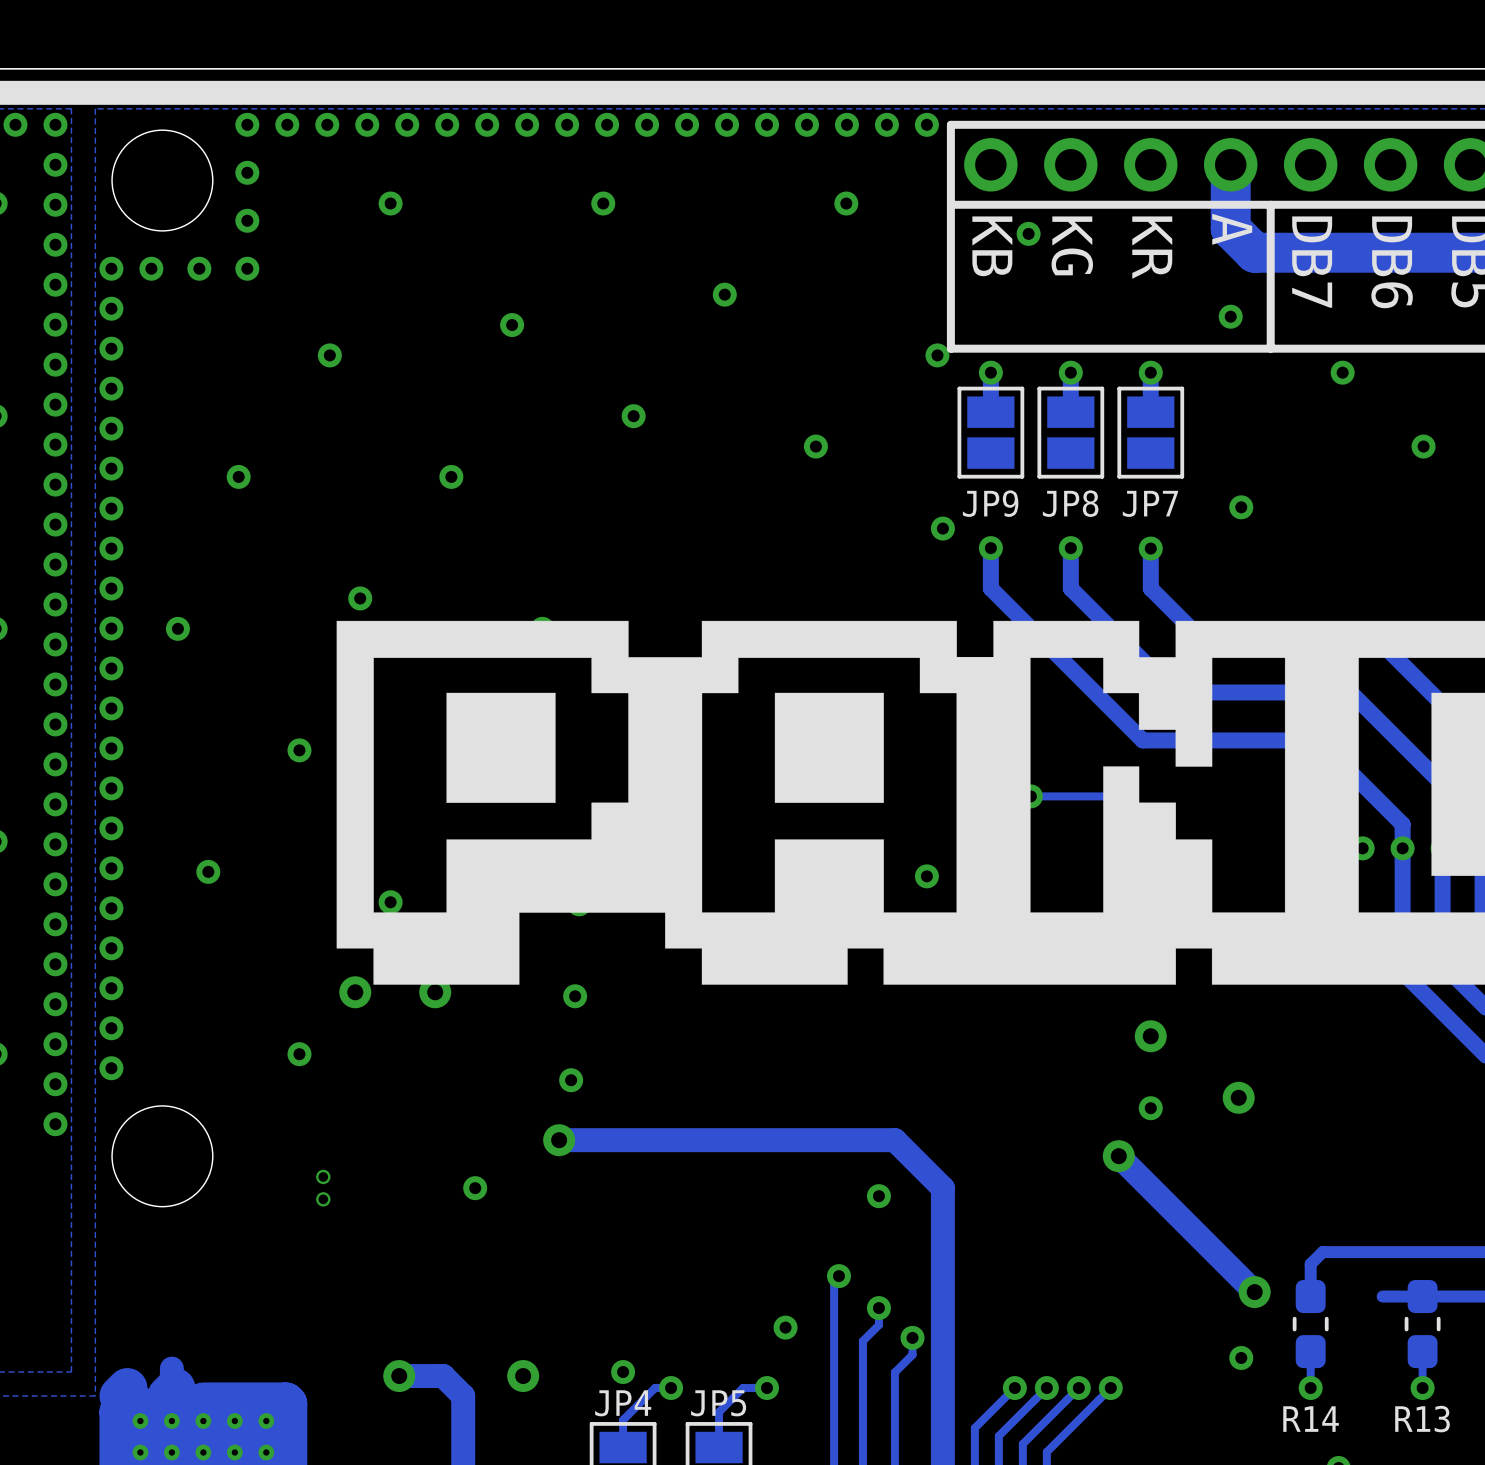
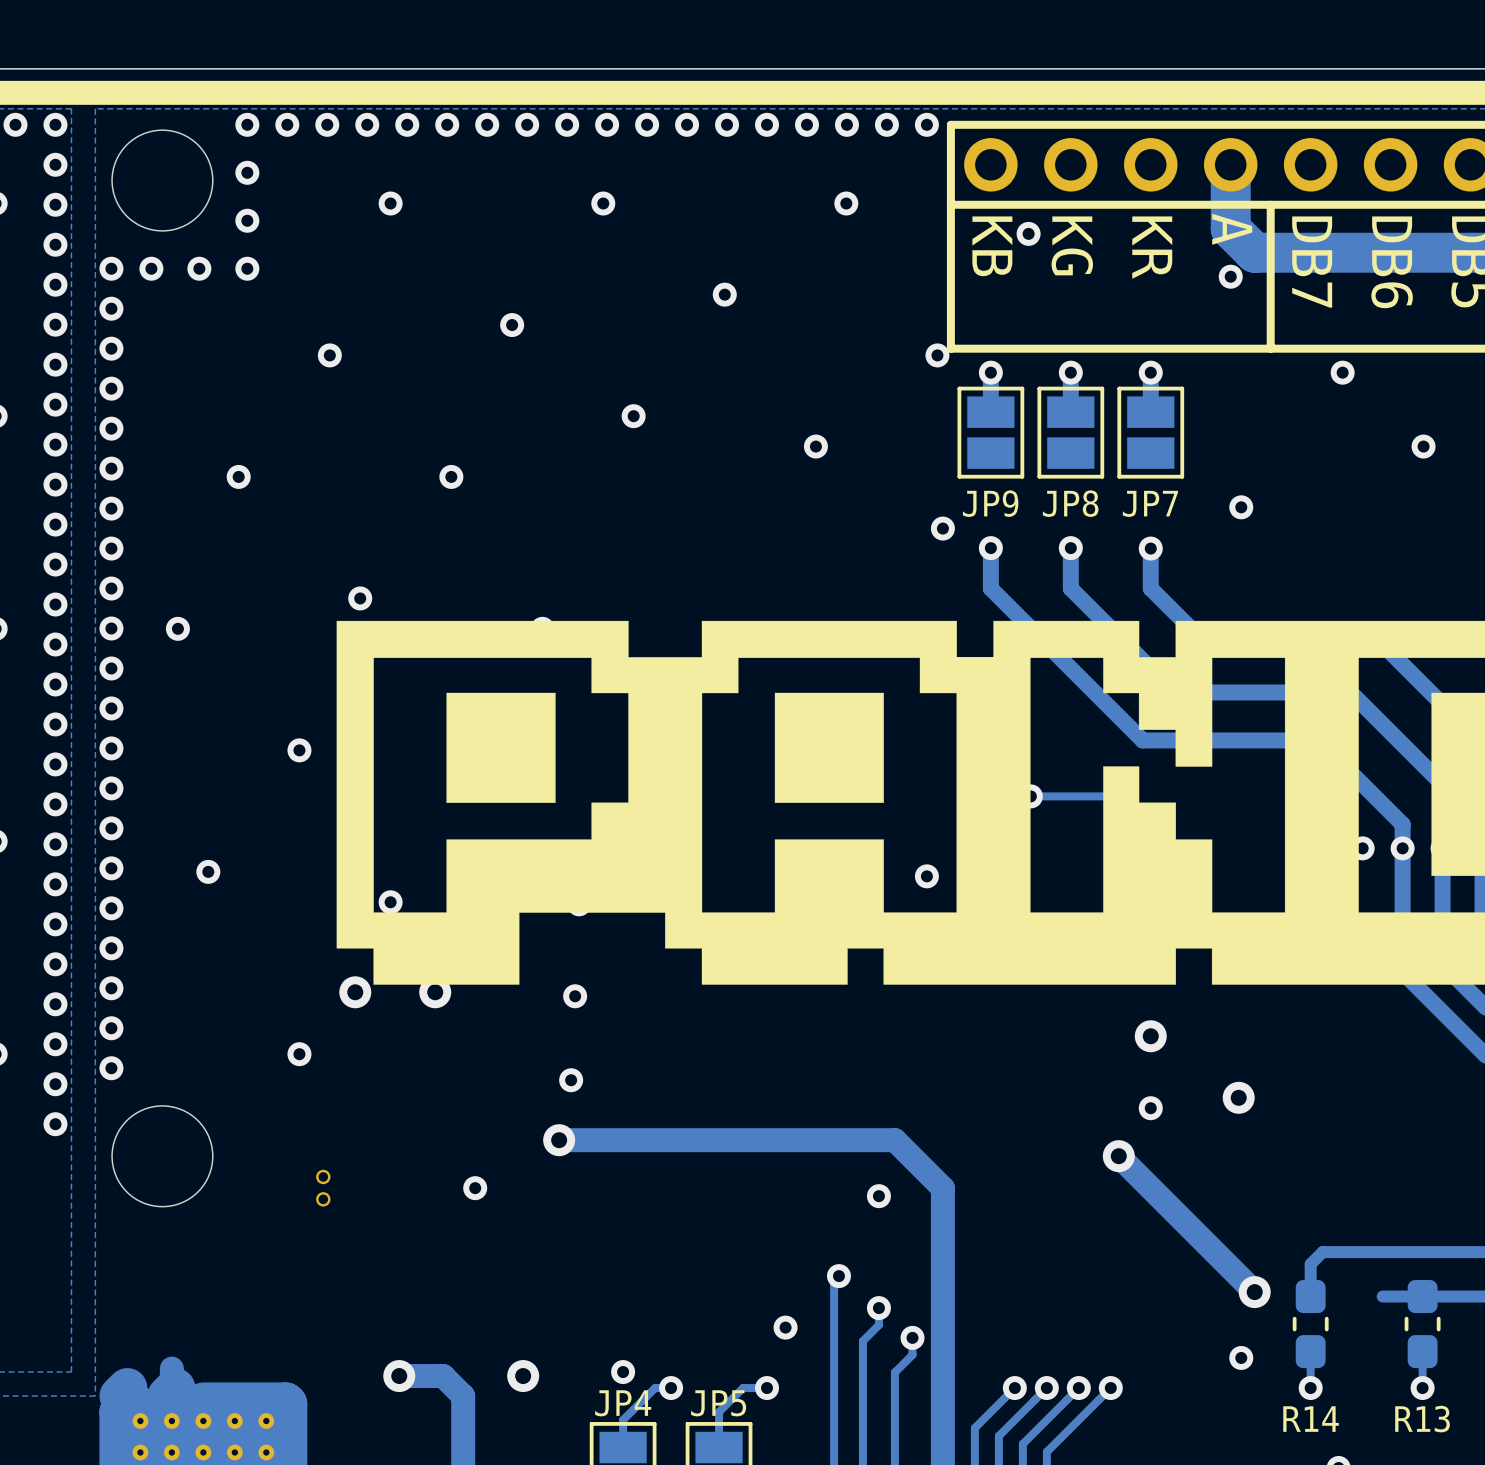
via position: (1230, 316) -> (1230, 276)

